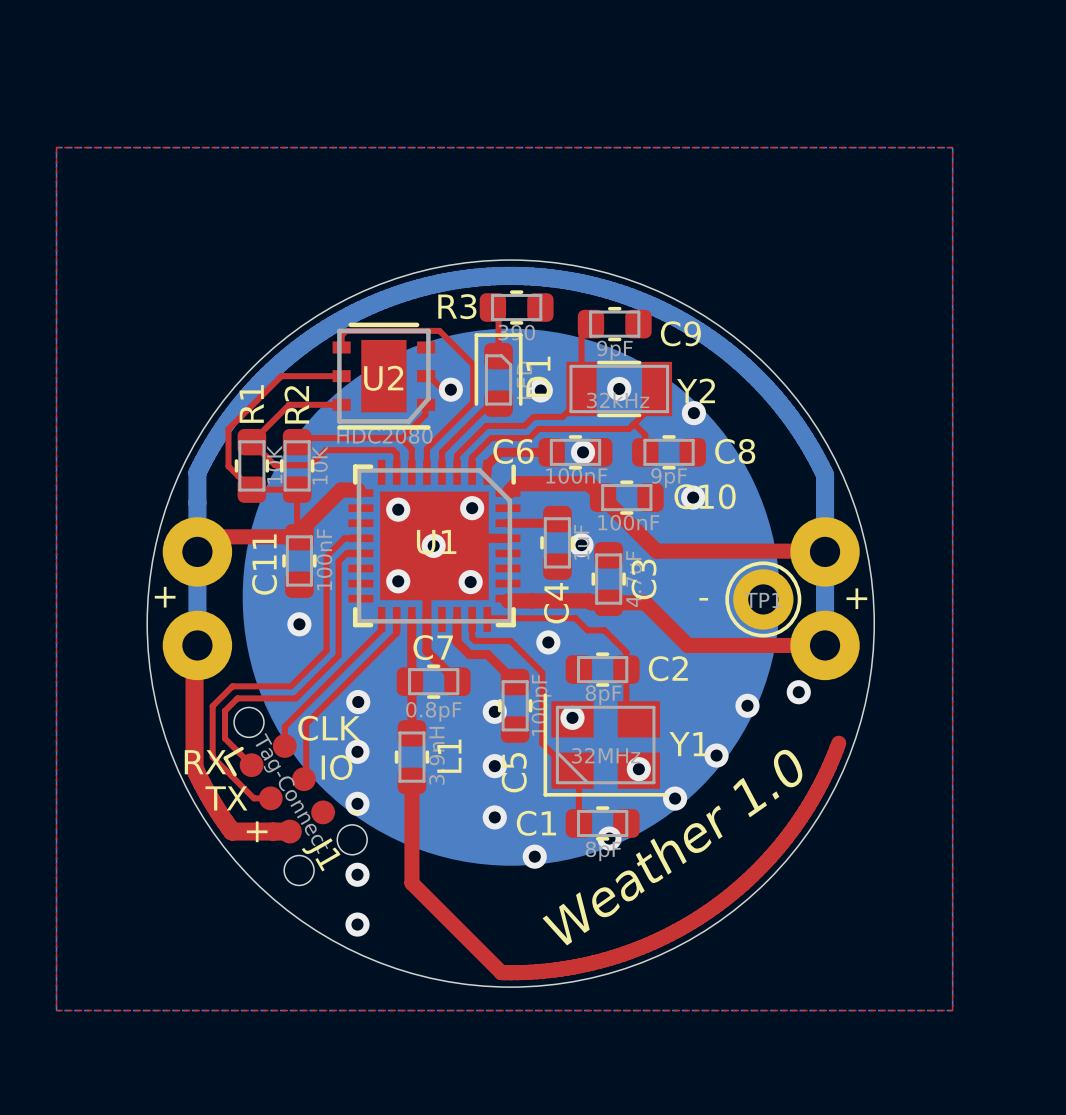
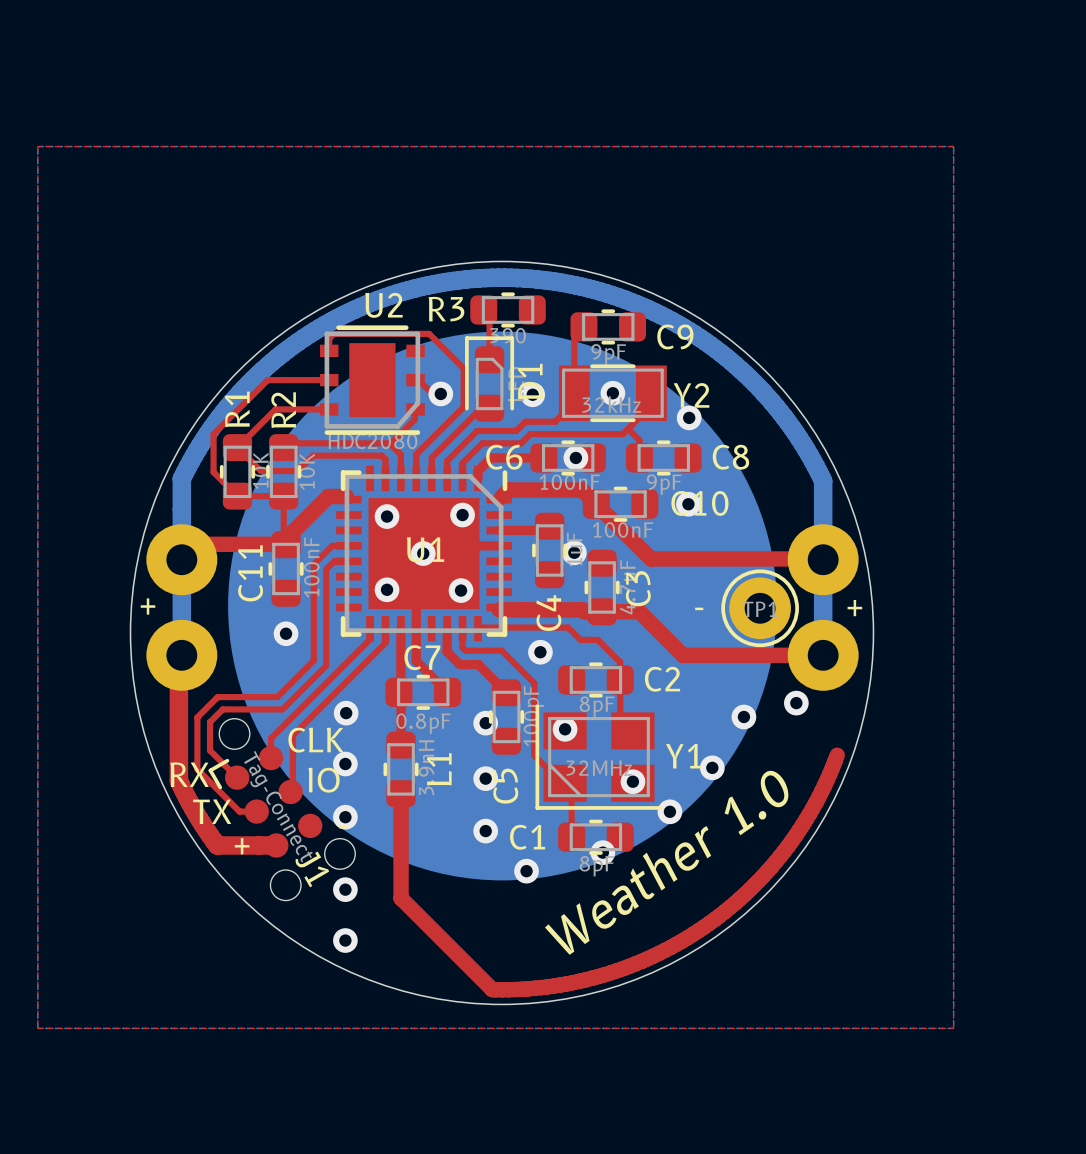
U2 name position: U2 (383, 378) -> U2 (383, 305)

